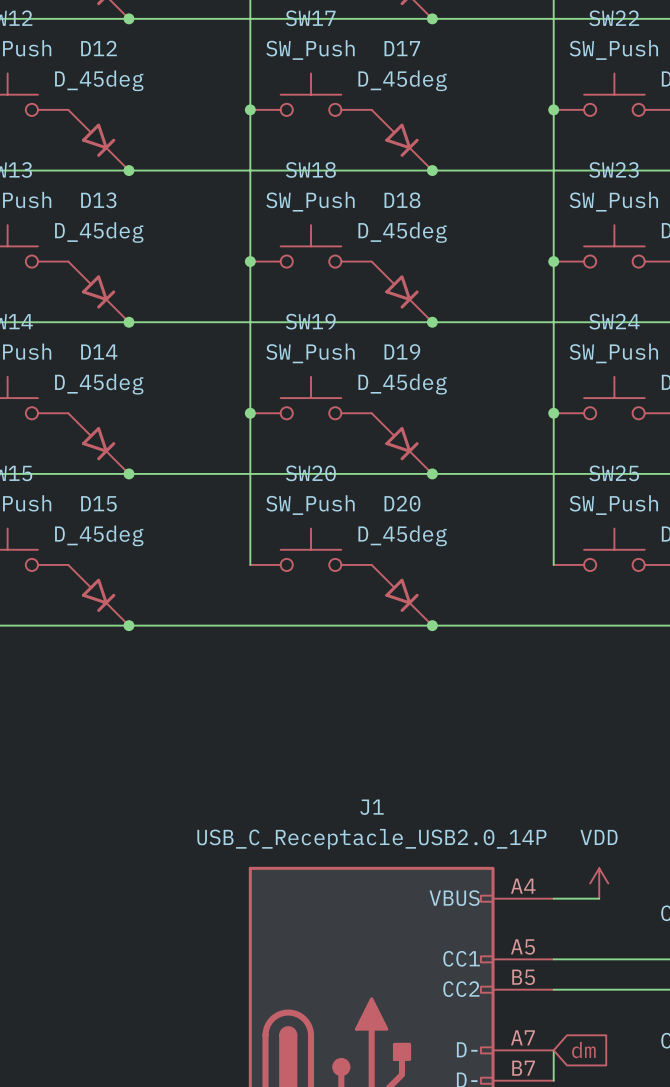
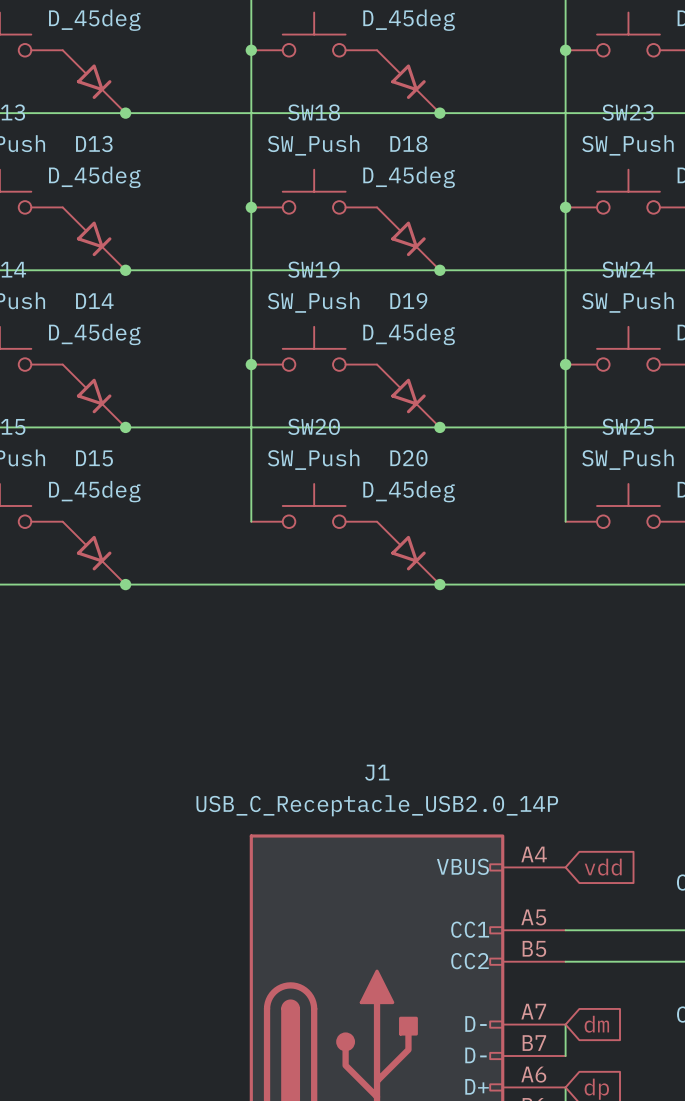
power symbol: VDD (599, 883) -> none
wire: (553, 898) (599, 898) -> none
global label: none -> vdd (603, 867)

